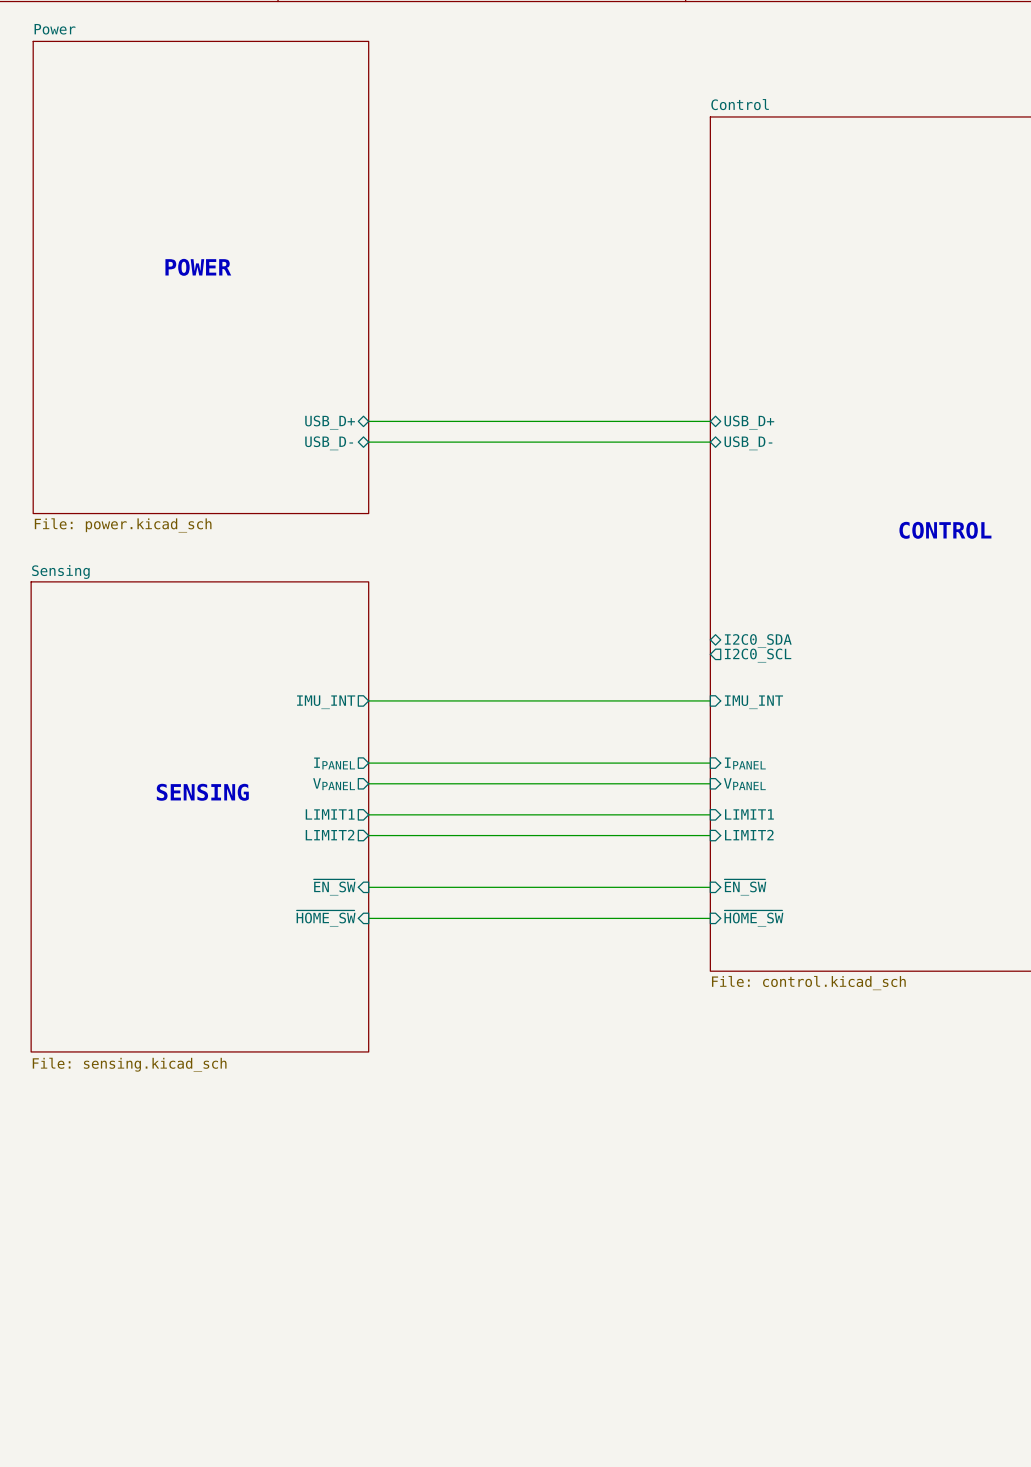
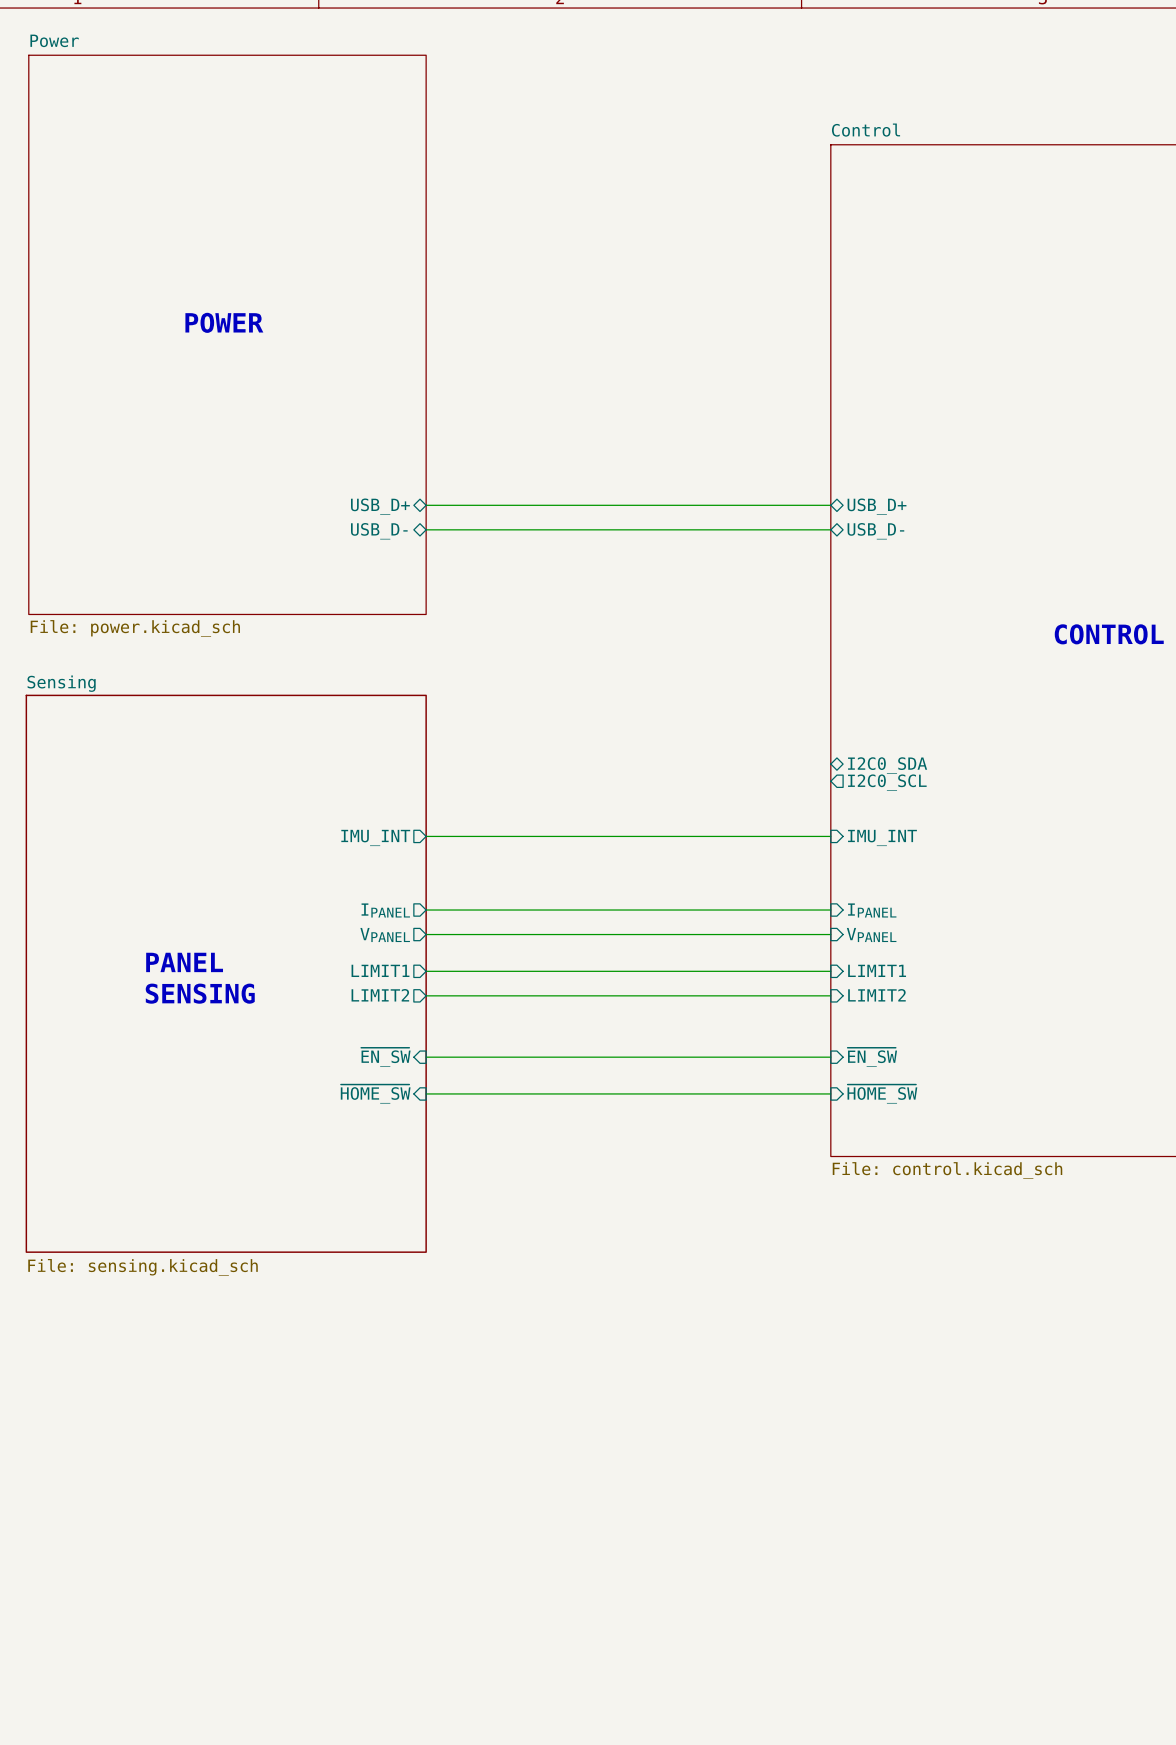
text position: SENSING (202, 792) -> SENSING (200, 993)
text: none -> PANEL (184, 962)

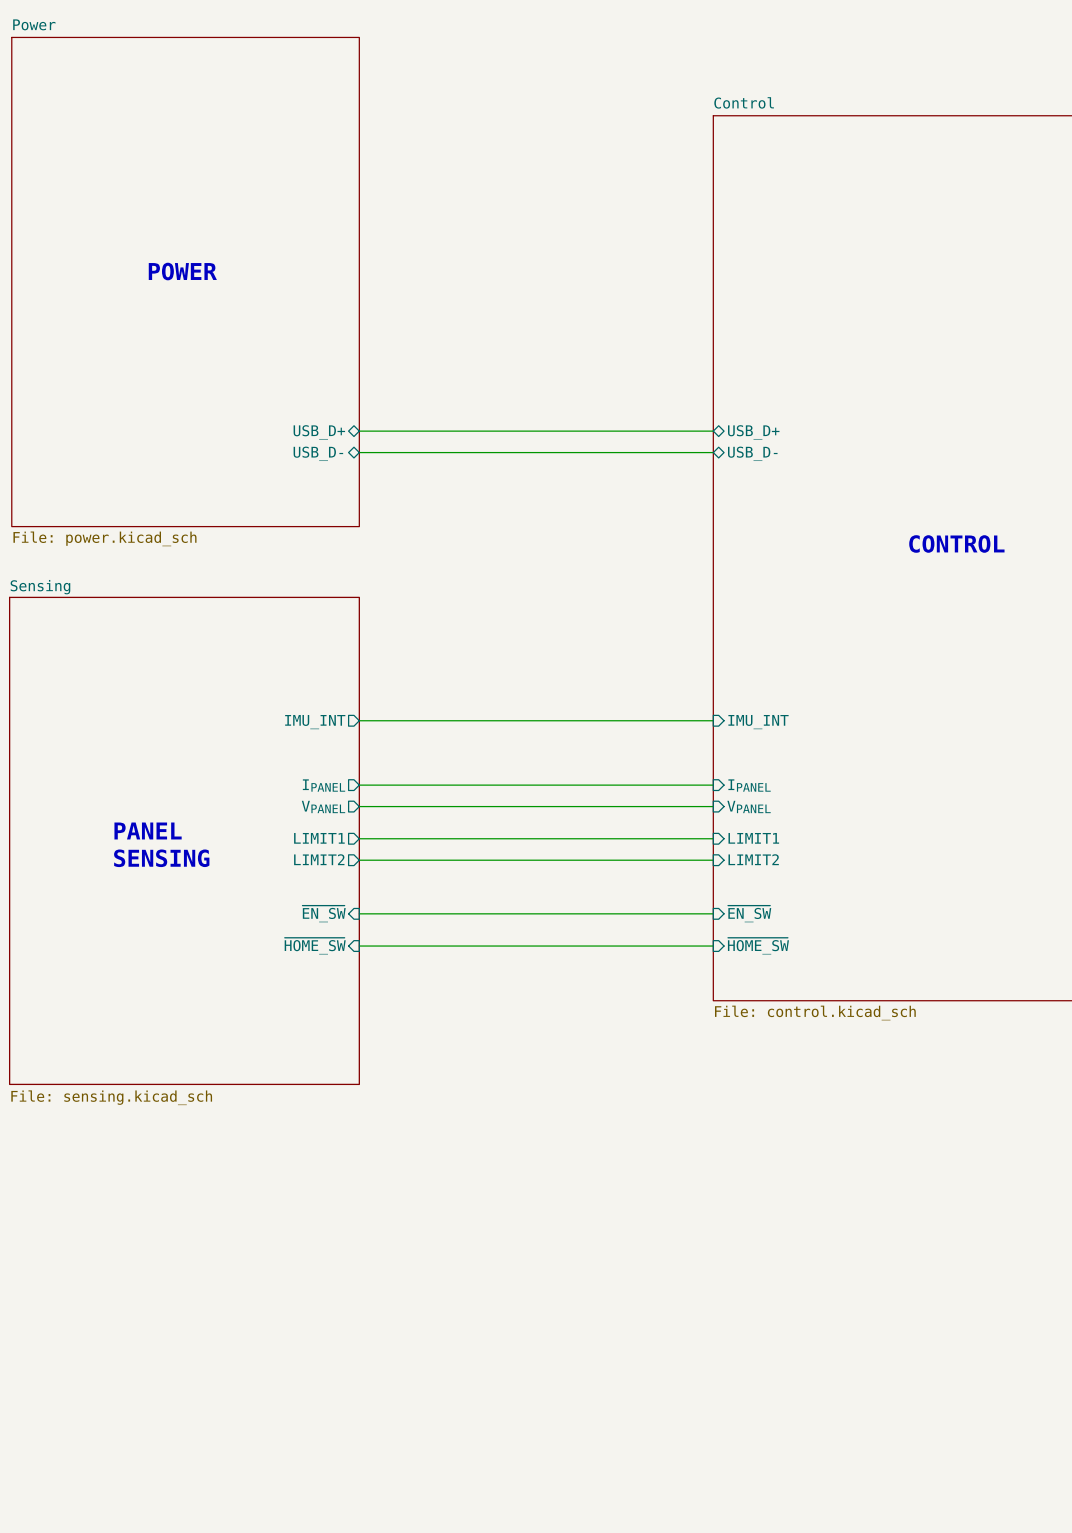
sheet pin: I2C0_SDA (887, 765) -> none
sheet pin: I2C0_SCL (887, 782) -> none

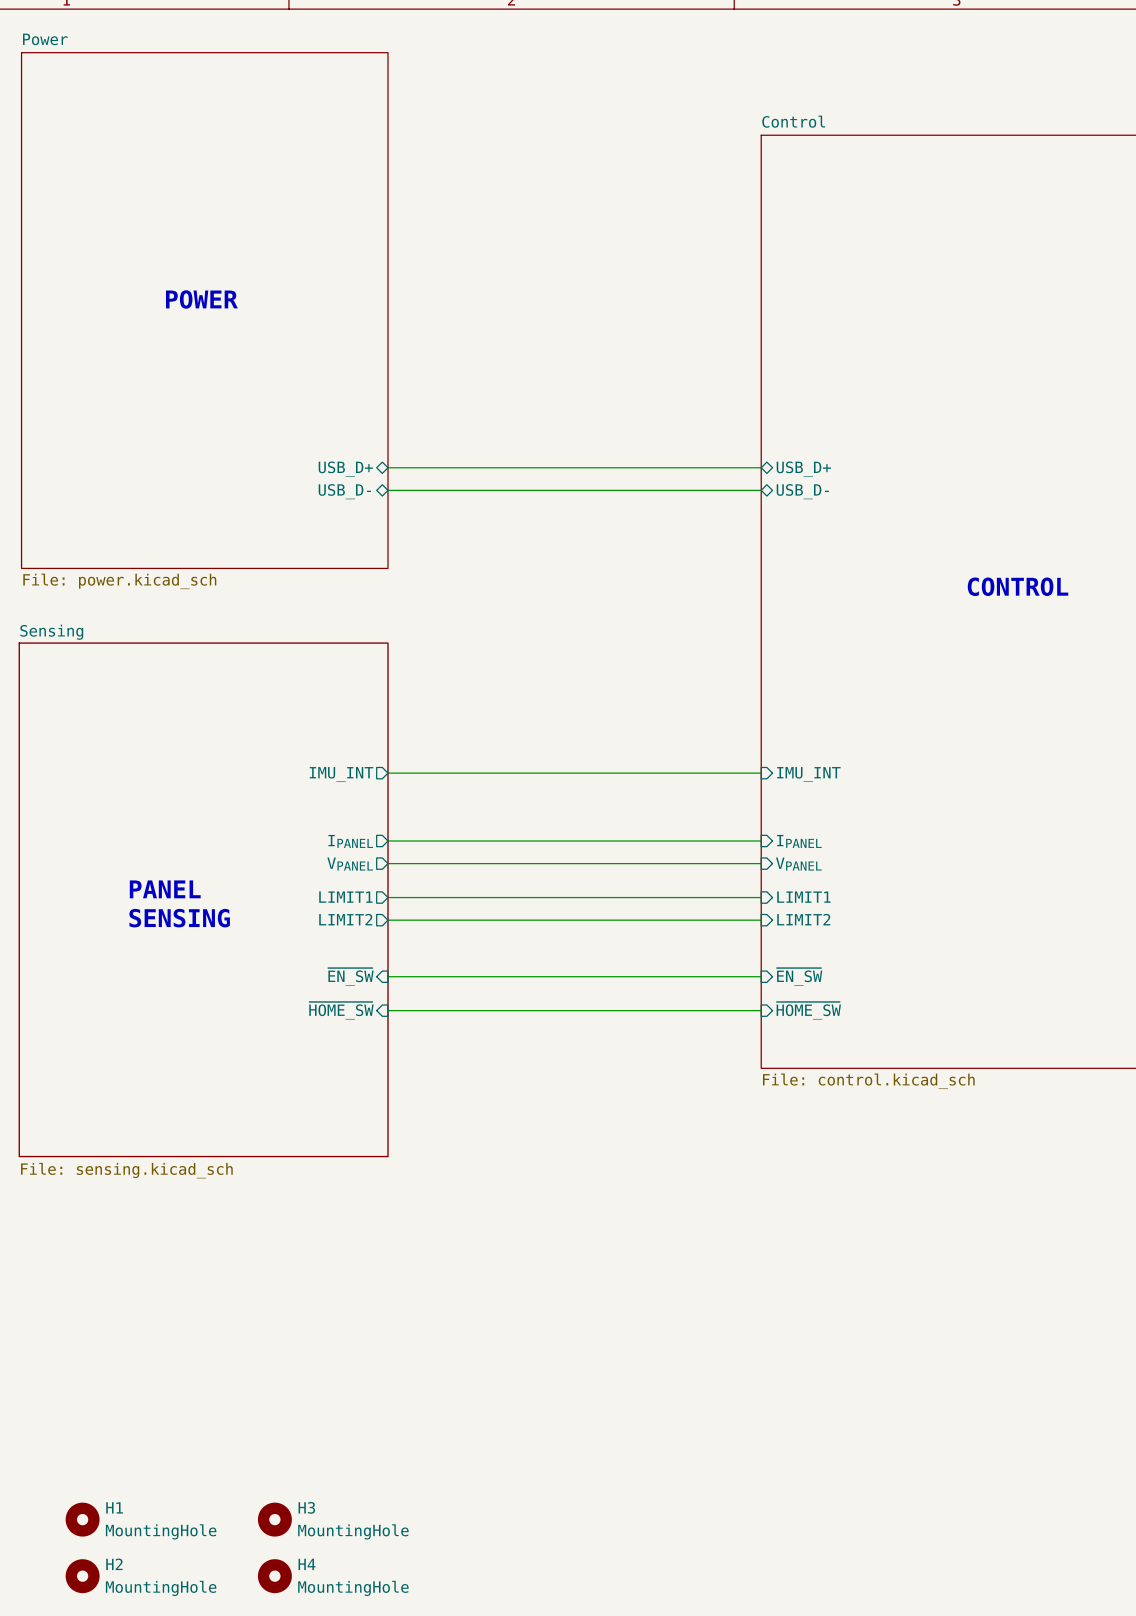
H1: none -> MountingHole (82, 1519)
H3: none -> MountingHole (274, 1519)
H2: none -> MountingHole (82, 1576)
H4: none -> MountingHole (274, 1576)

